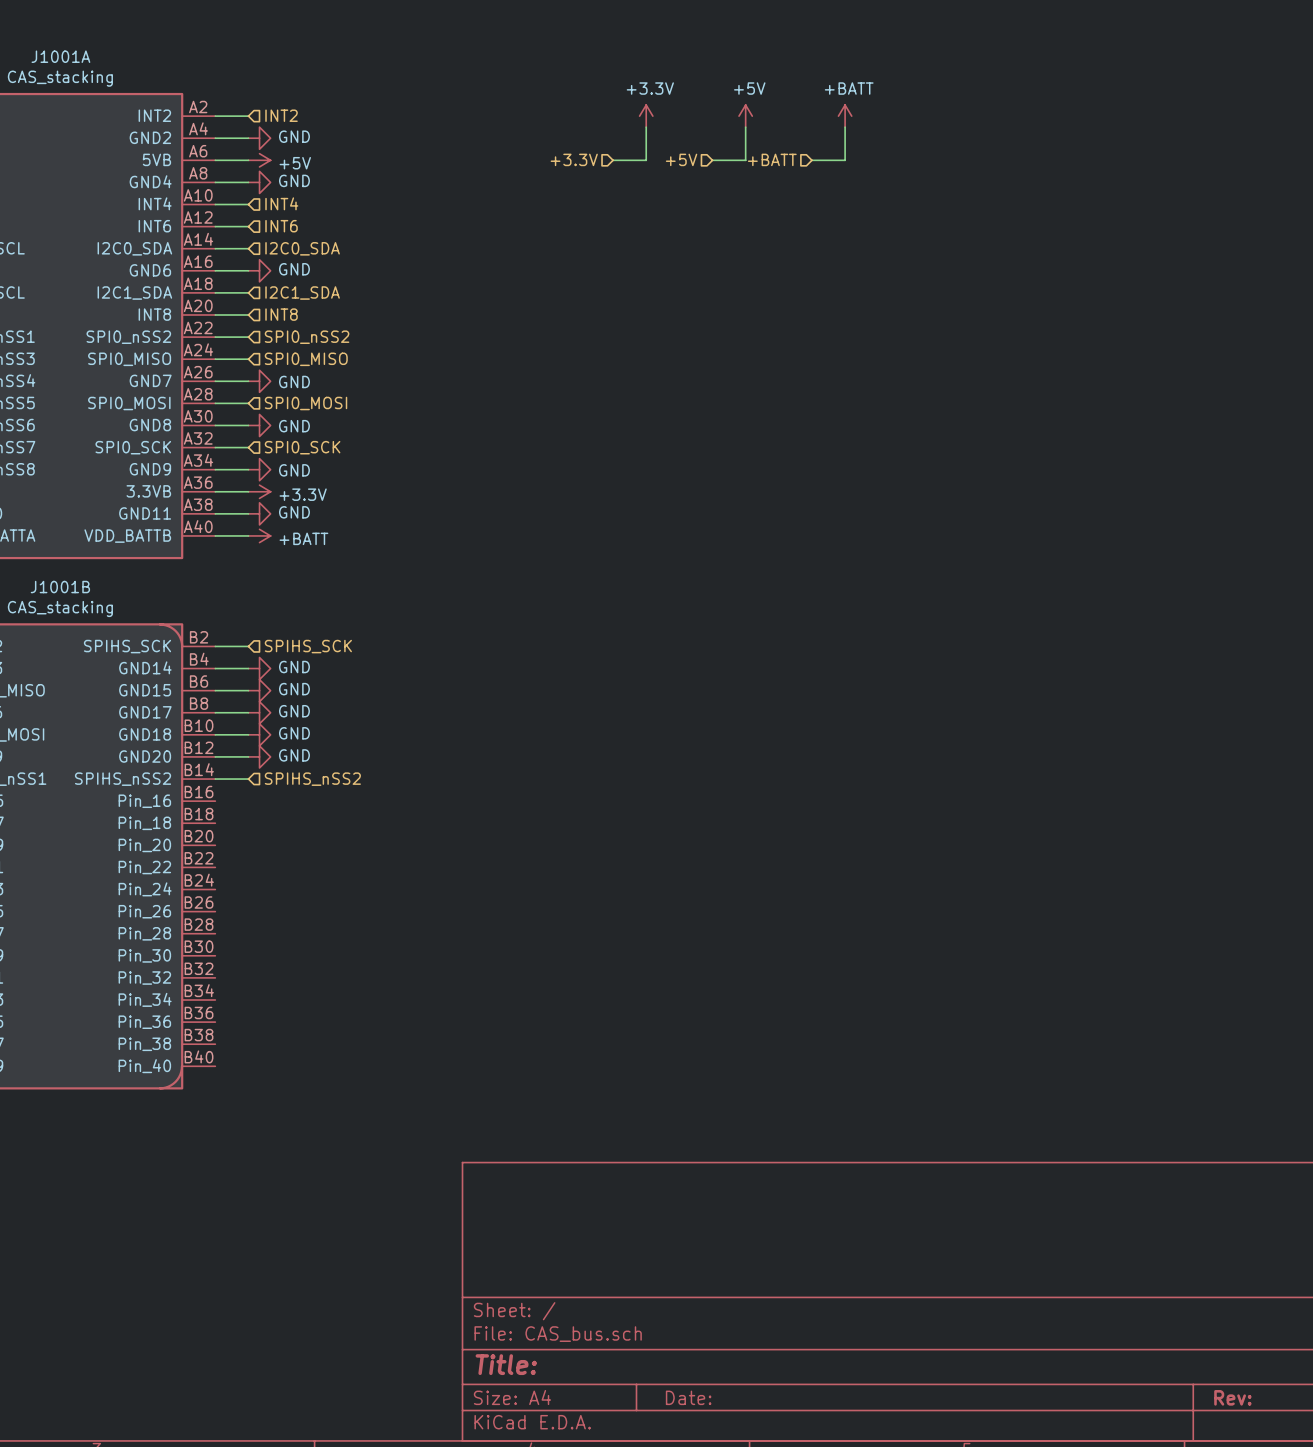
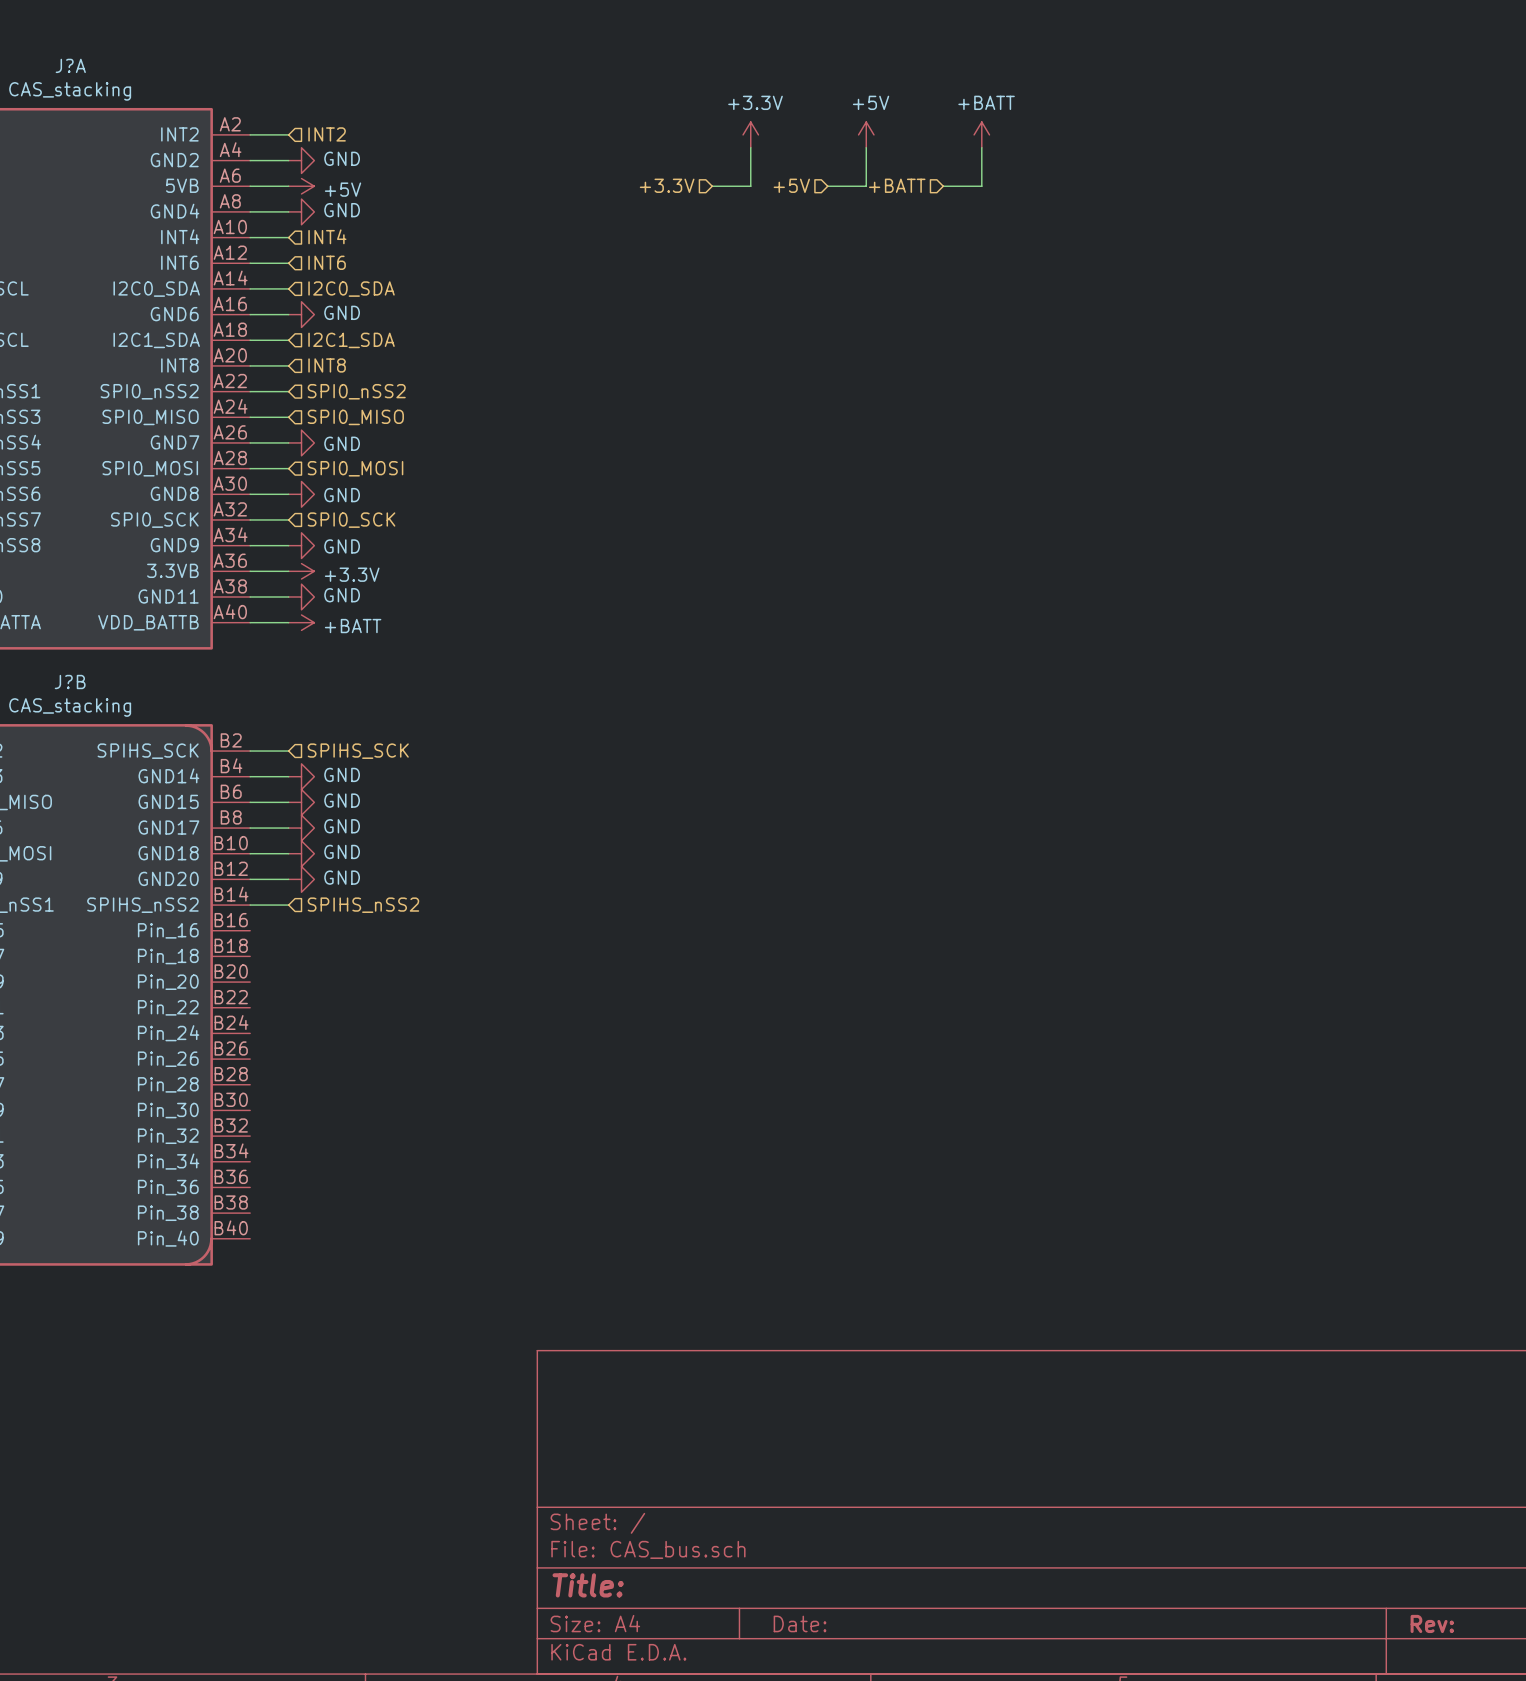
J1001A name: J1001A (60, 56) -> J?A (70, 65)
J1001B name: J1001B (60, 587) -> J?B (70, 682)

